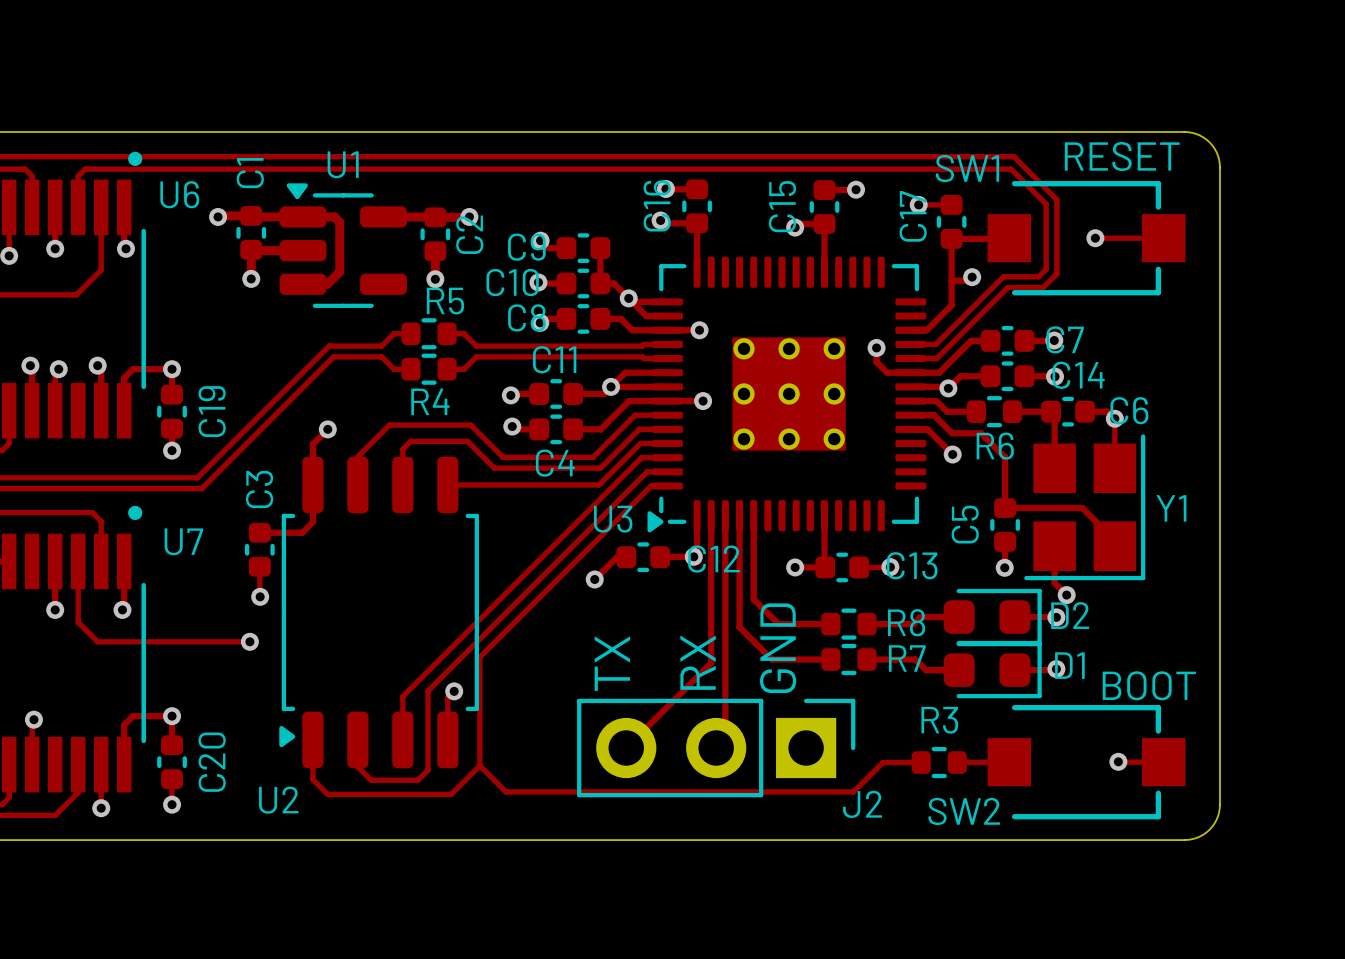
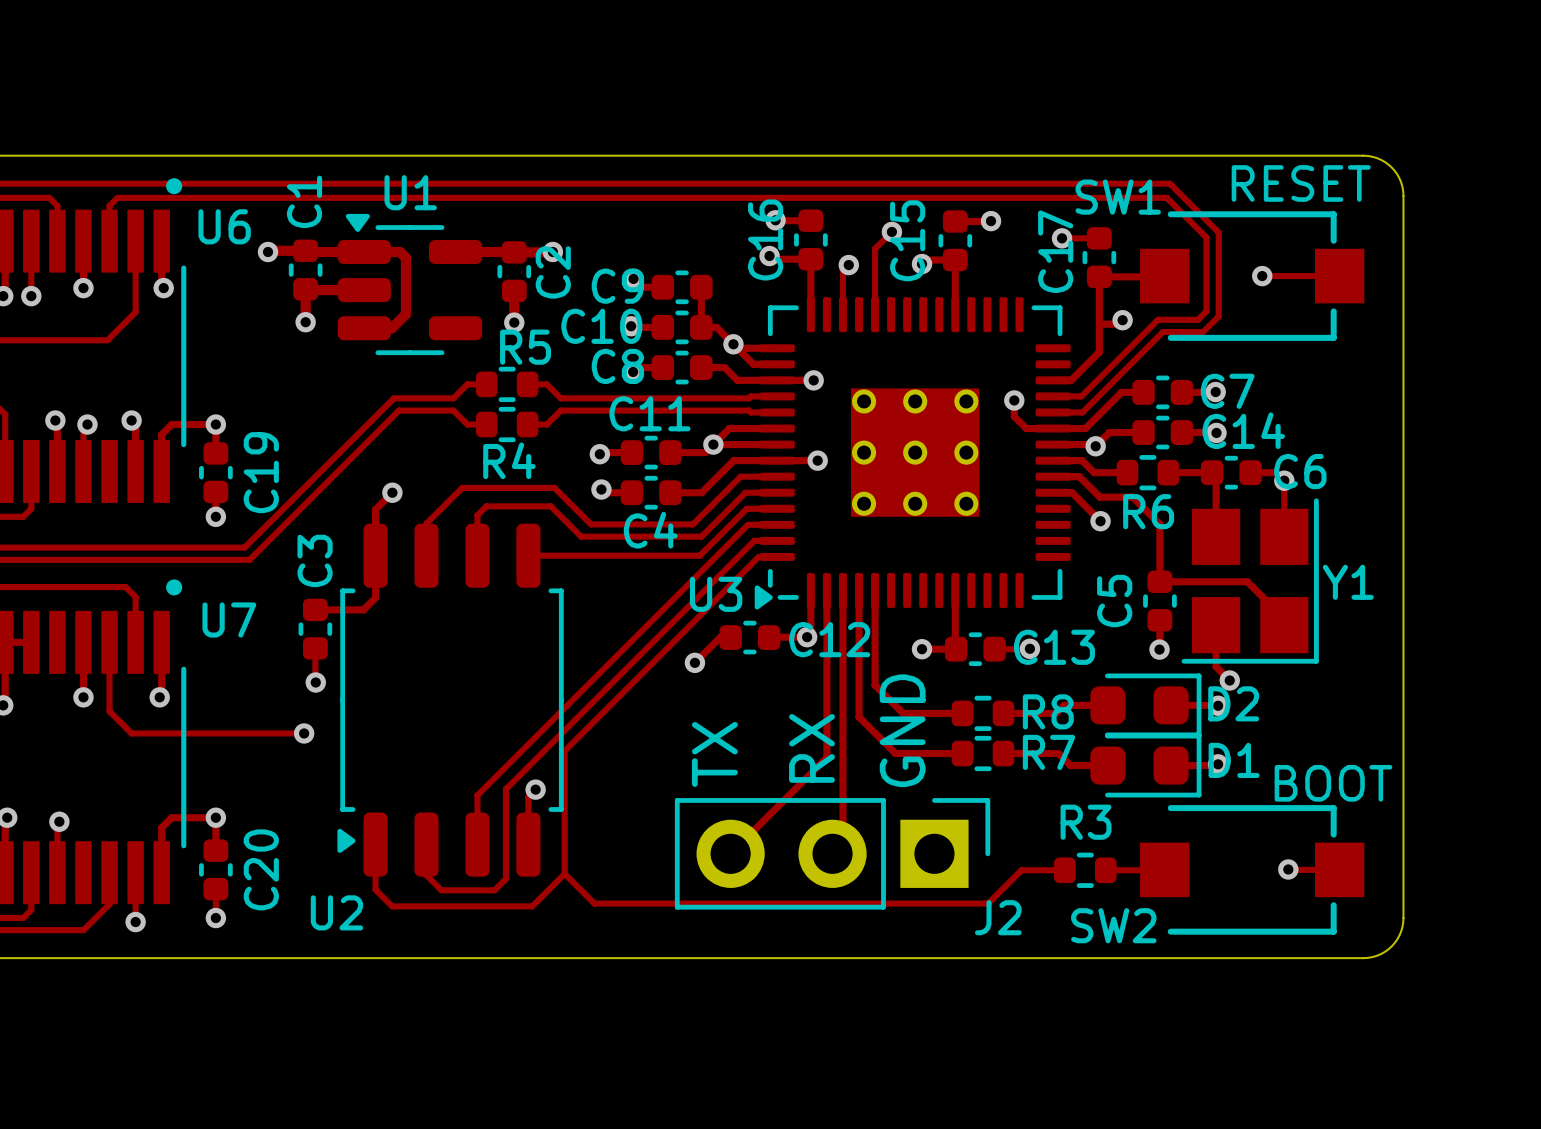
track: none -> (891, 231) (875, 248) (875, 314)
via: none -> (891, 231)
track: none -> (848, 265) (842, 270) (842, 314)
via: none -> (848, 265)

